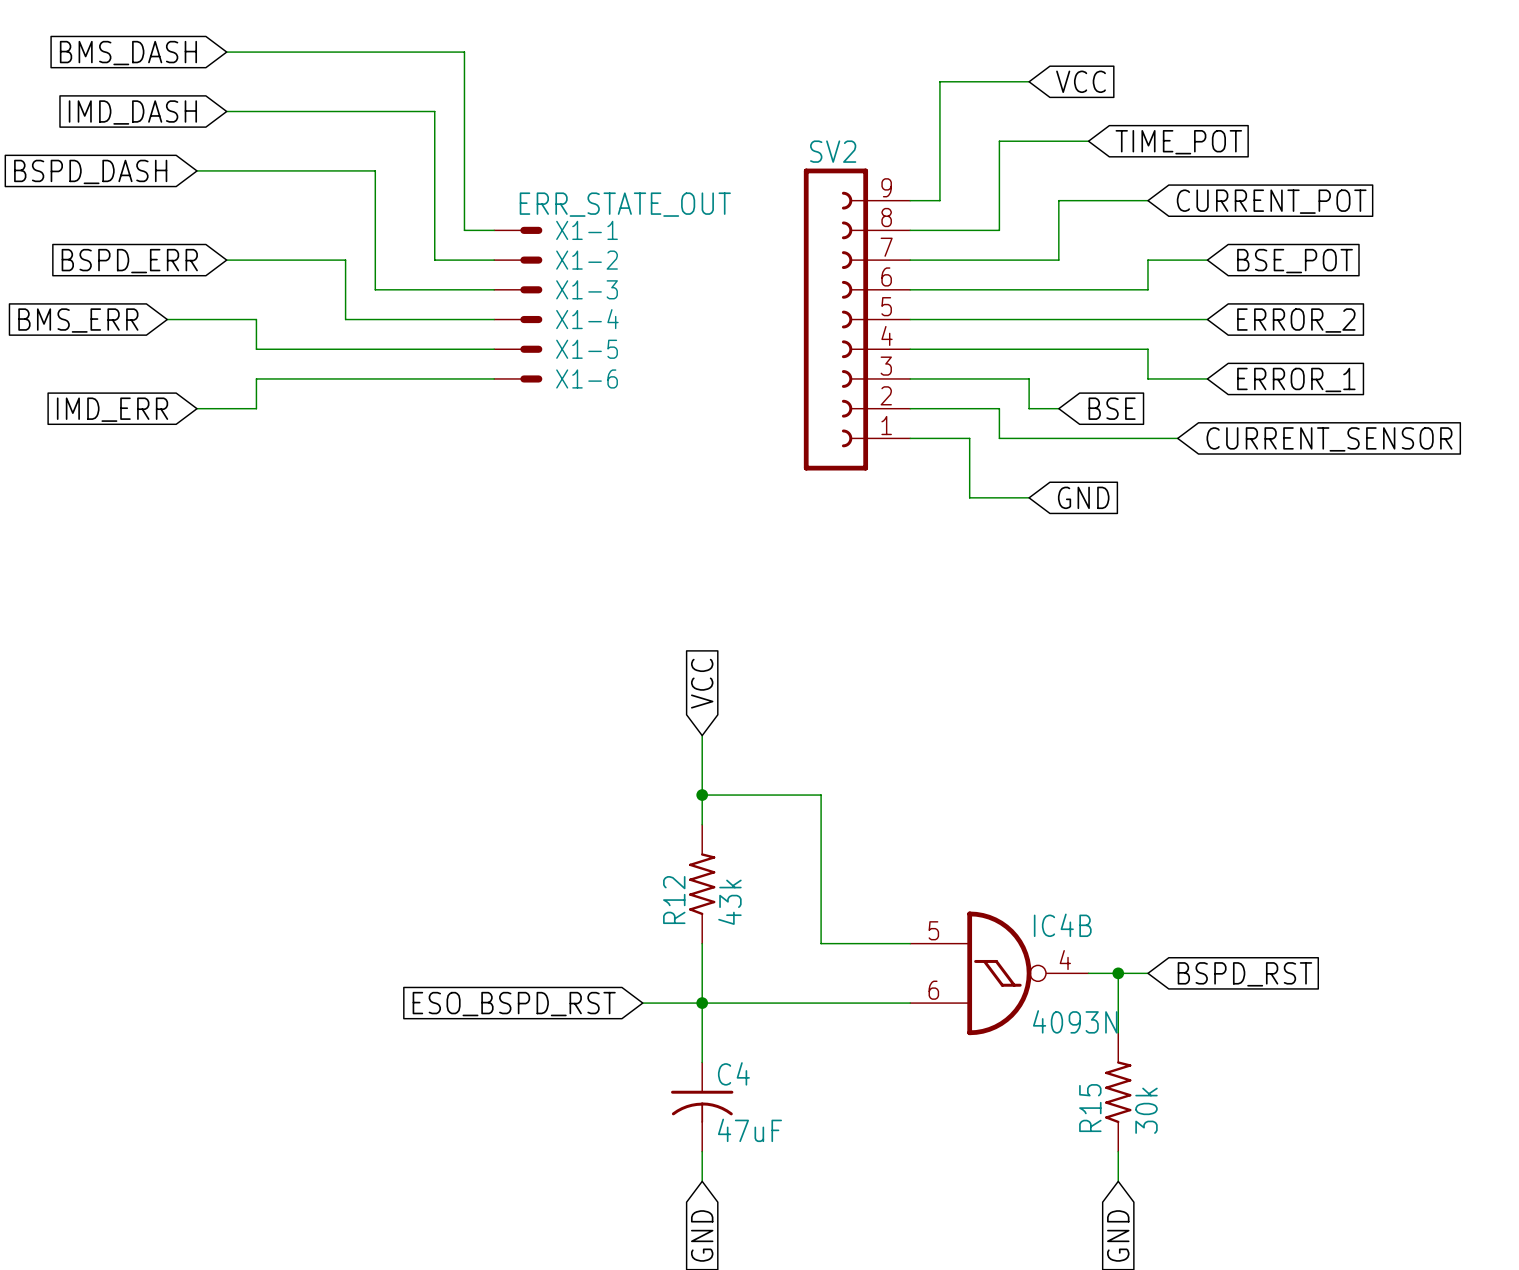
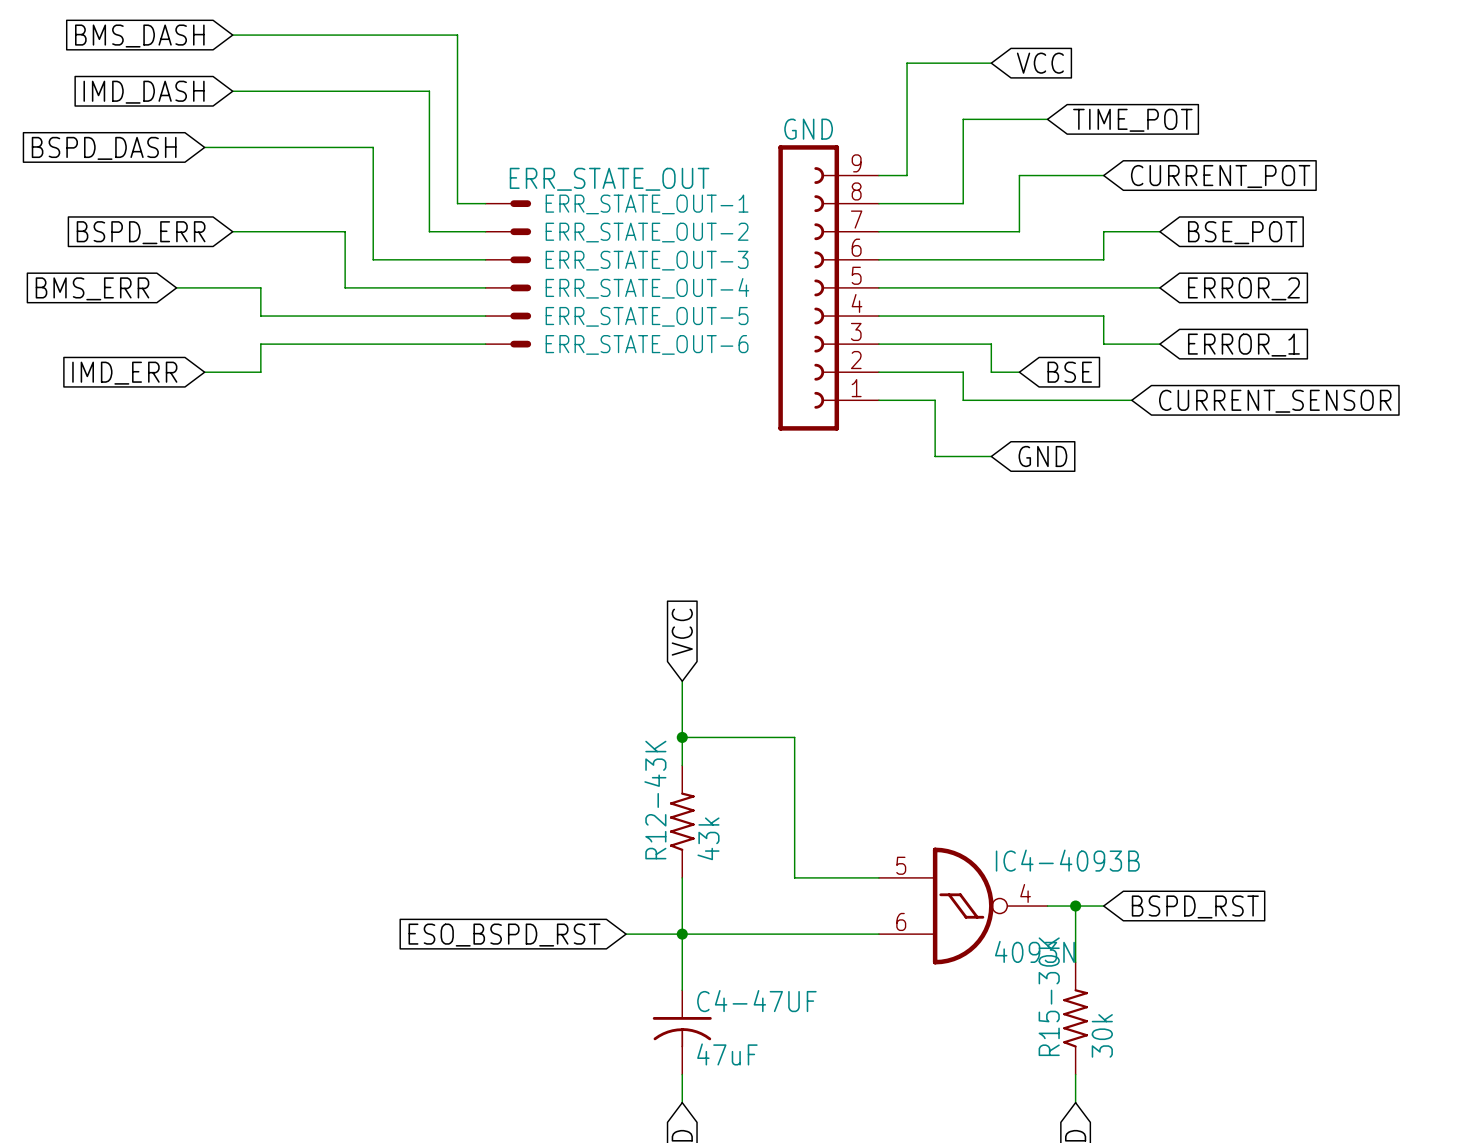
SV2 name: SV2 (833, 151) -> GND (808, 129)
X1-1 name: X1-1 (587, 230) -> ERR_STATE_OUT-1 (647, 204)
X1-2 name: X1-2 (587, 260) -> ERR_STATE_OUT-2 (647, 232)
X1-3 name: X1-3 (587, 289) -> ERR_STATE_OUT-3 (647, 260)
X1-4 name: X1-4 (587, 319) -> ERR_STATE_OUT-4 (647, 288)
X1-5 name: X1-5 (587, 349) -> ERR_STATE_OUT-5 (647, 316)
X1-6 name: X1-6 (587, 378) -> ERR_STATE_OUT-6 (647, 344)
R12 name: R12 (674, 900) -> R12-43K (655, 800)
IC4B name: IC4B (1062, 925) -> IC4-4093B (1067, 860)
C4 name: C4 (733, 1073) -> C4-47UF (756, 1001)
R15 name: R15 (1090, 1108) -> R15-30K (1049, 996)

